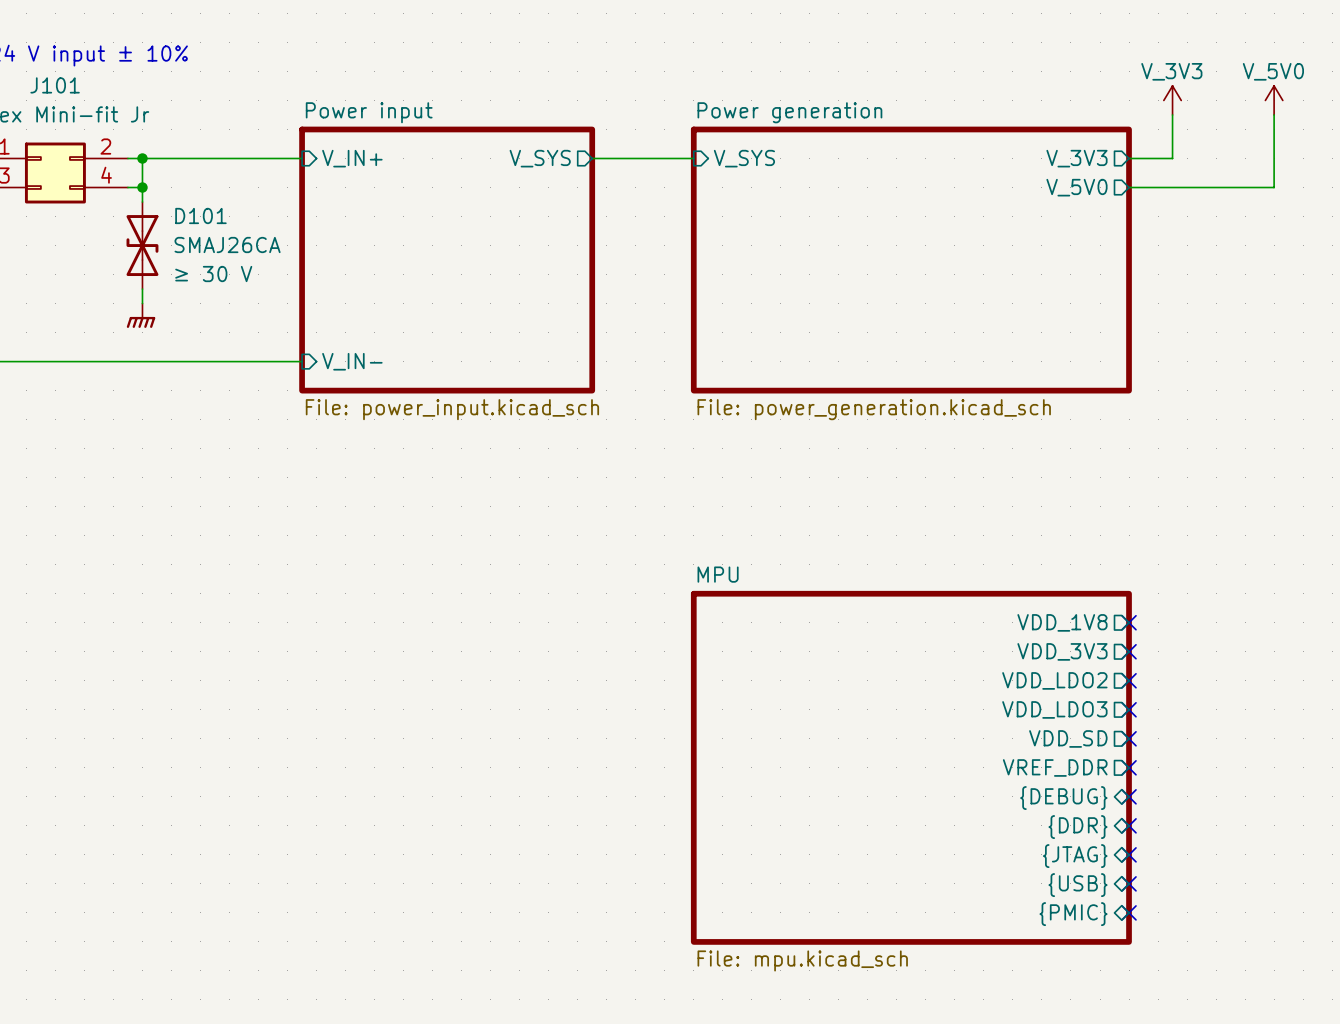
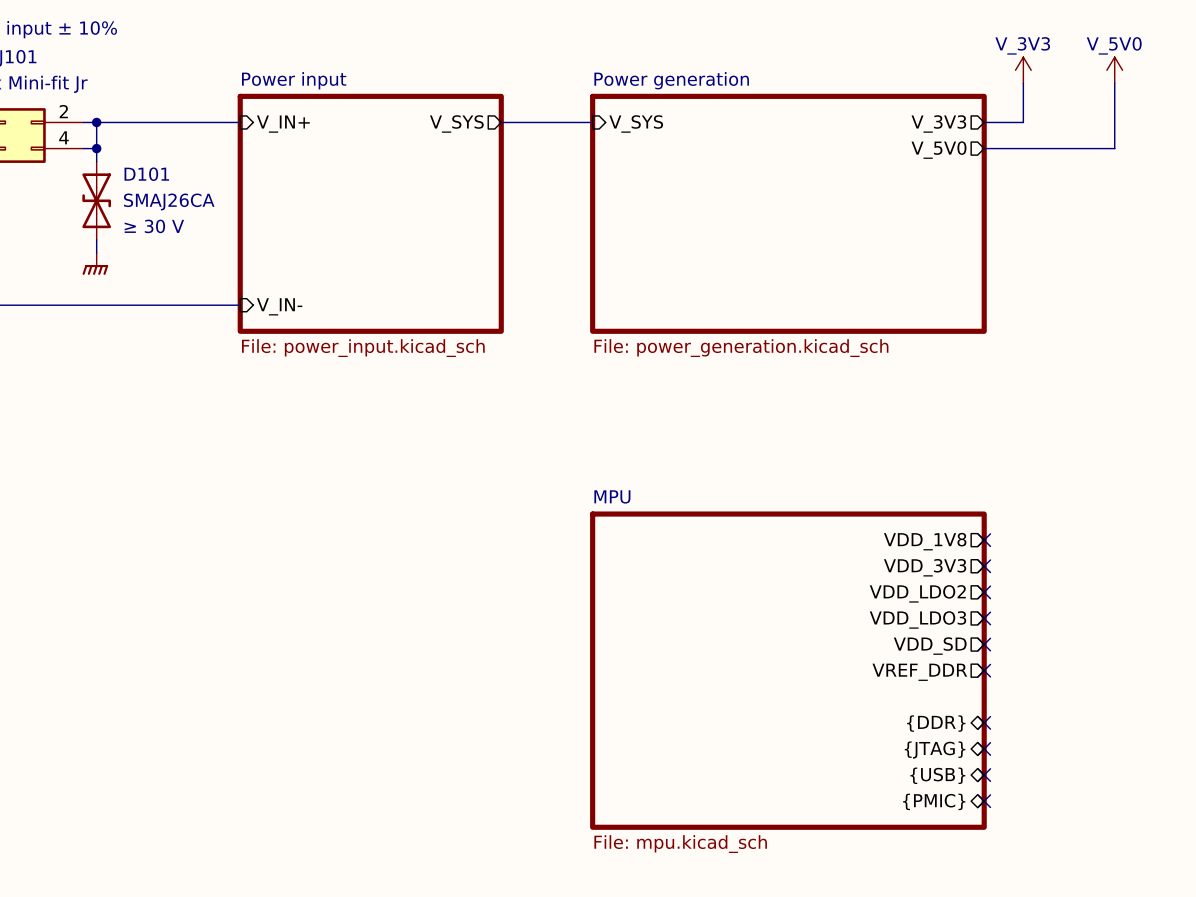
no-connect mark: (1129, 796) -> none
sheet pin: {DEBUG} (1063, 798) -> none

